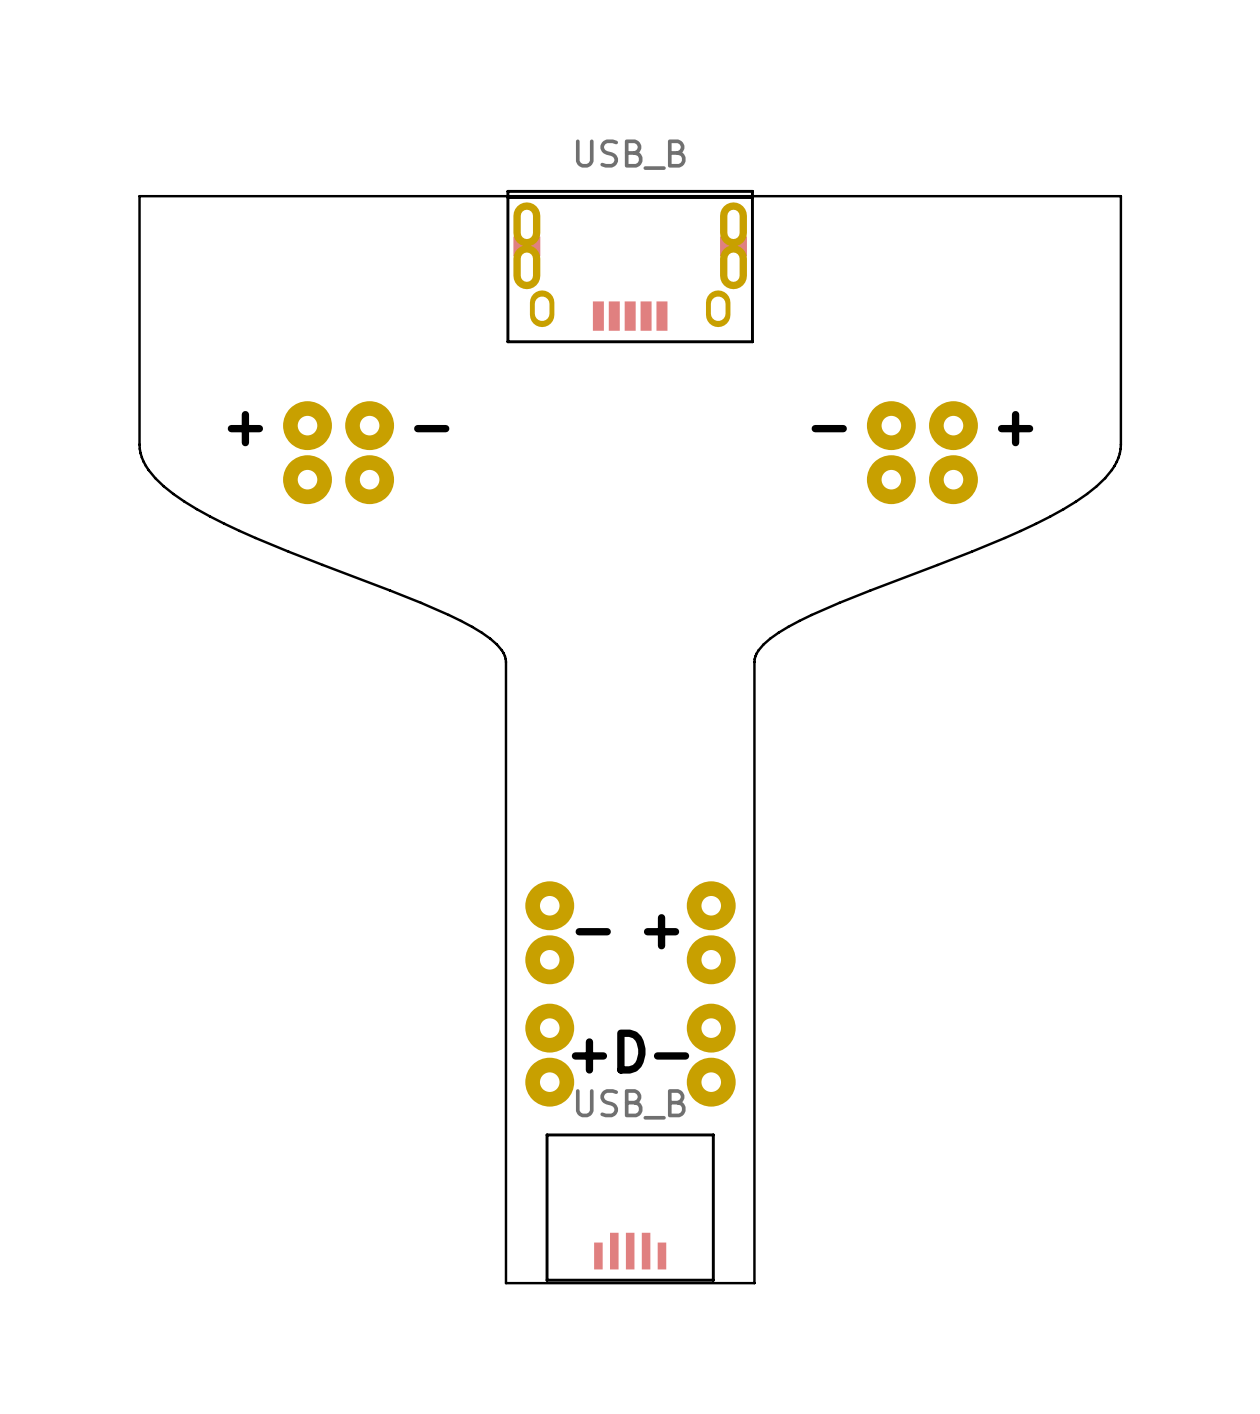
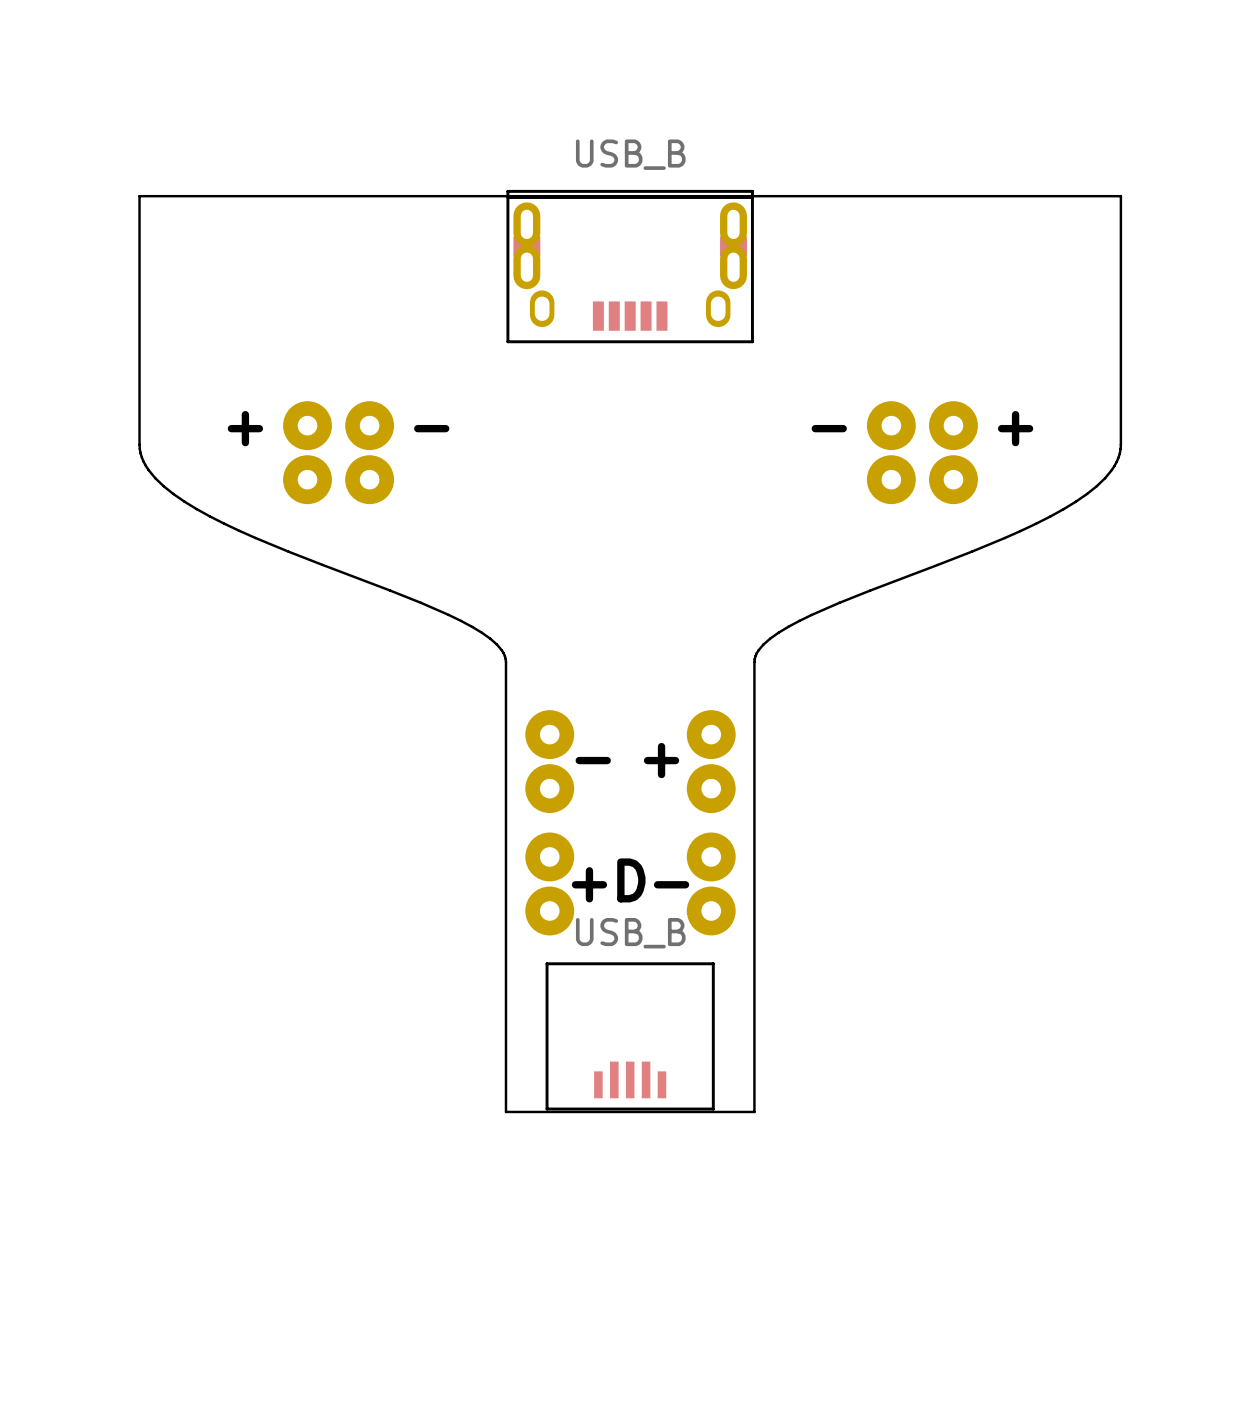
part: none -> (549, 761)
part: none -> (711, 761)
text position: - (593, 931) -> - (593, 760)
text position: + (661, 931) -> + (661, 760)
part position: (549, 932) -> (549, 883)
part position: (711, 932) -> (711, 883)
text position: +D- (630, 1051) -> +D- (630, 880)
part: (549, 1055) -> none
part: (711, 1055) -> none
board edge: (505, 1111) (505, 1283) (754, 1283) (754, 1111) -> (505, 1111) (754, 1111)
part position: (630, 1207) -> (630, 1036)

